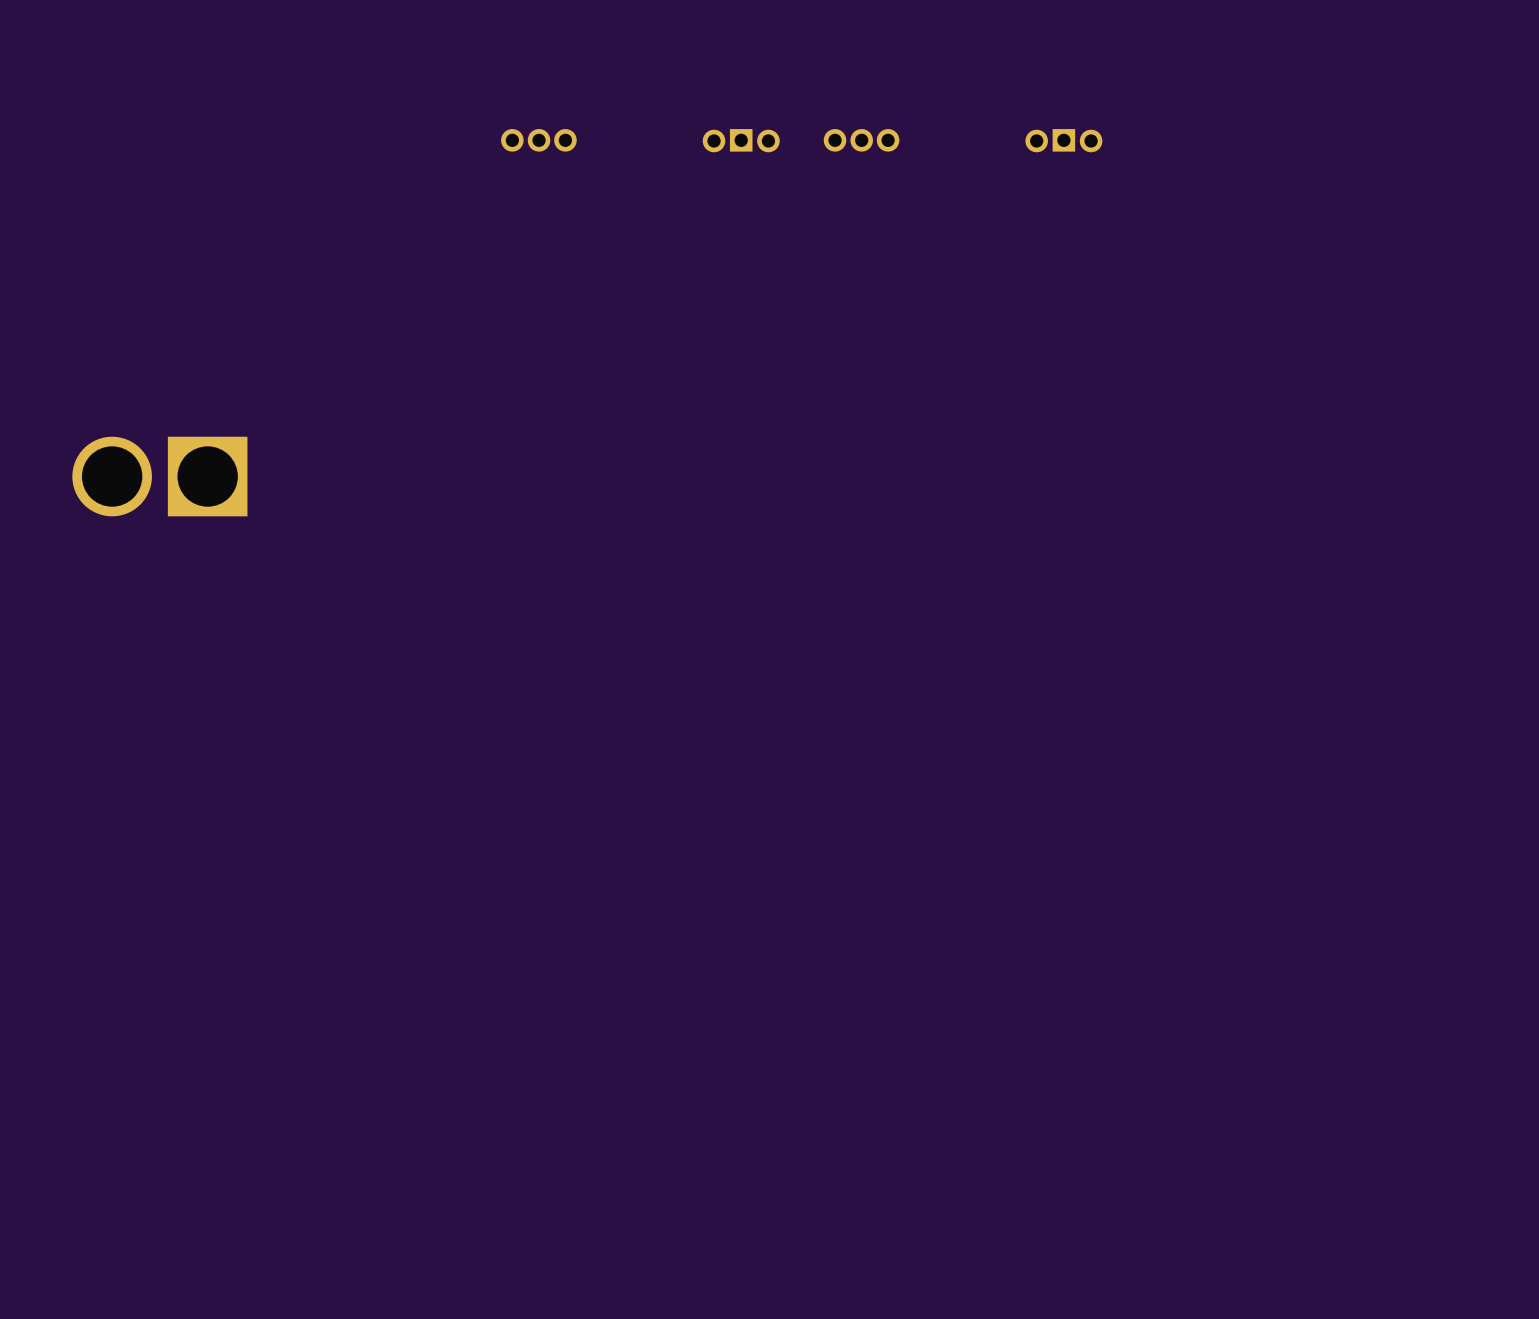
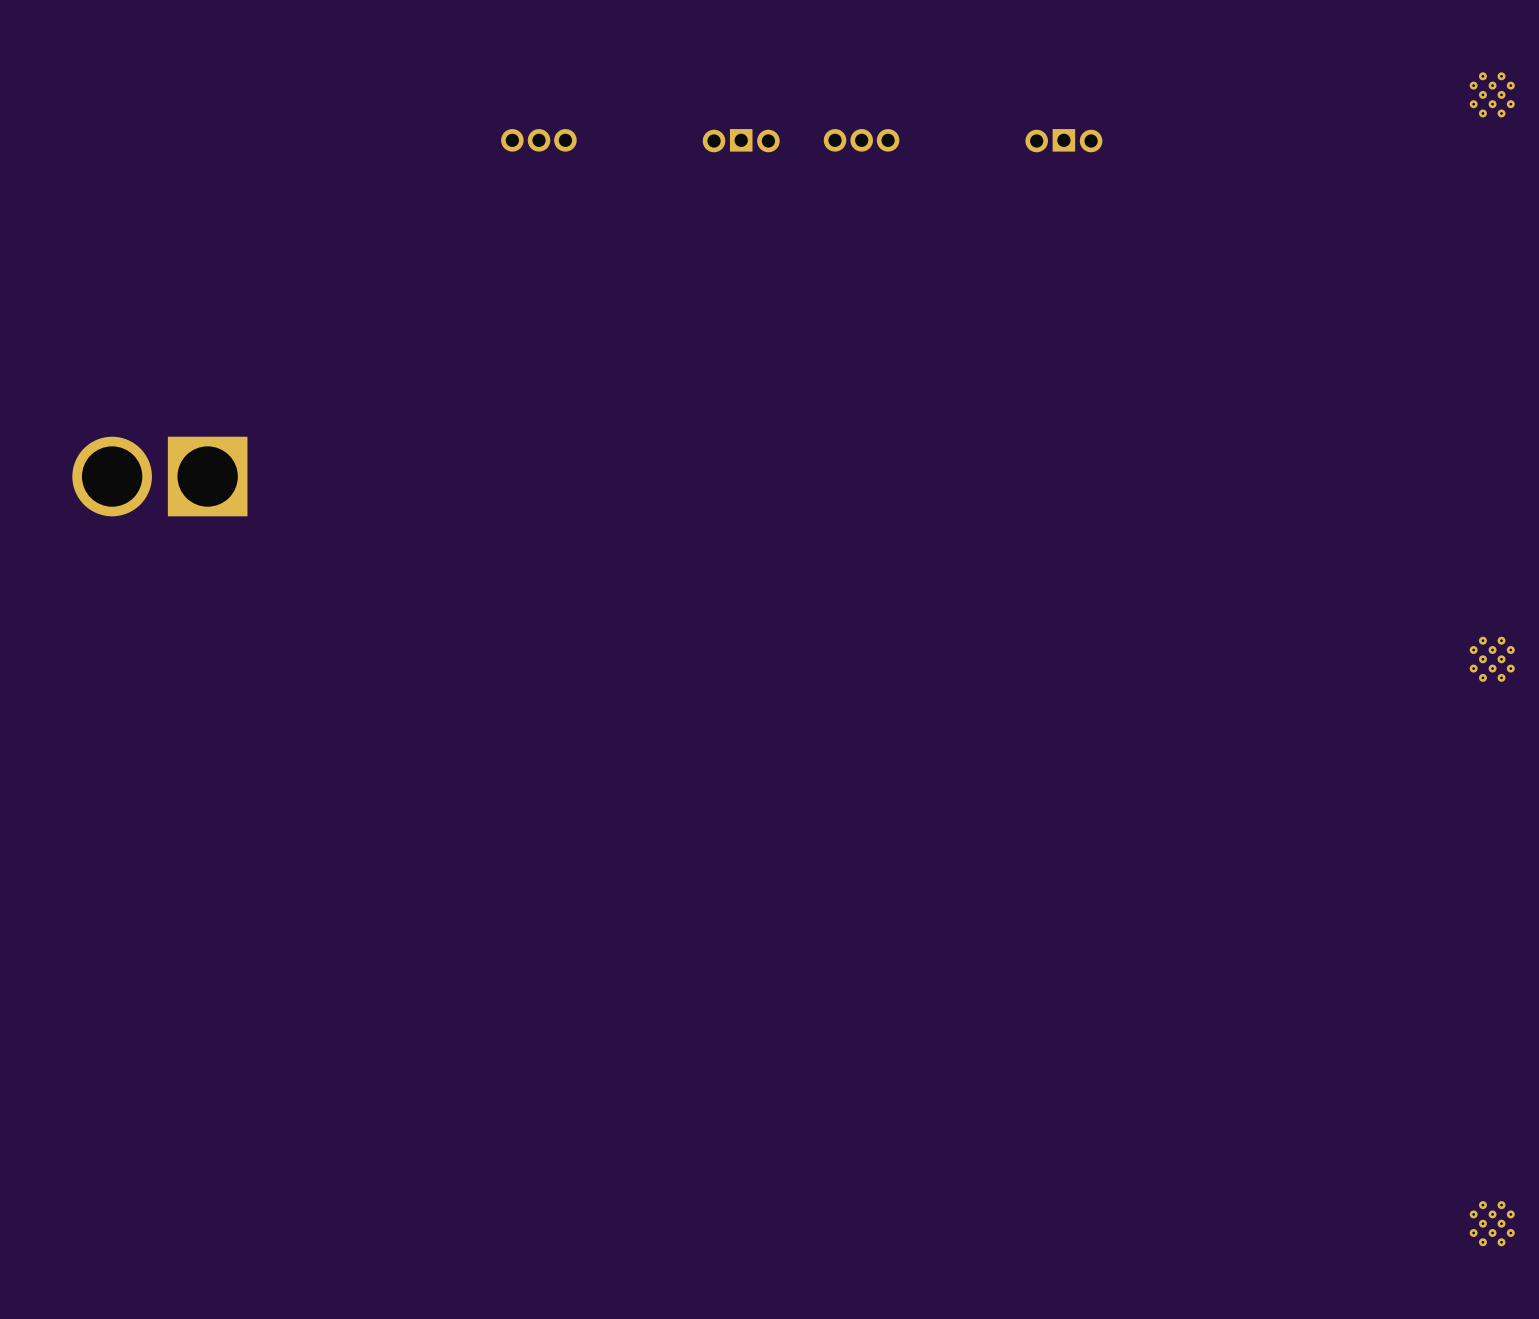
part: none -> (1492, 94)
part: none -> (1492, 659)
part: none -> (1492, 1223)

